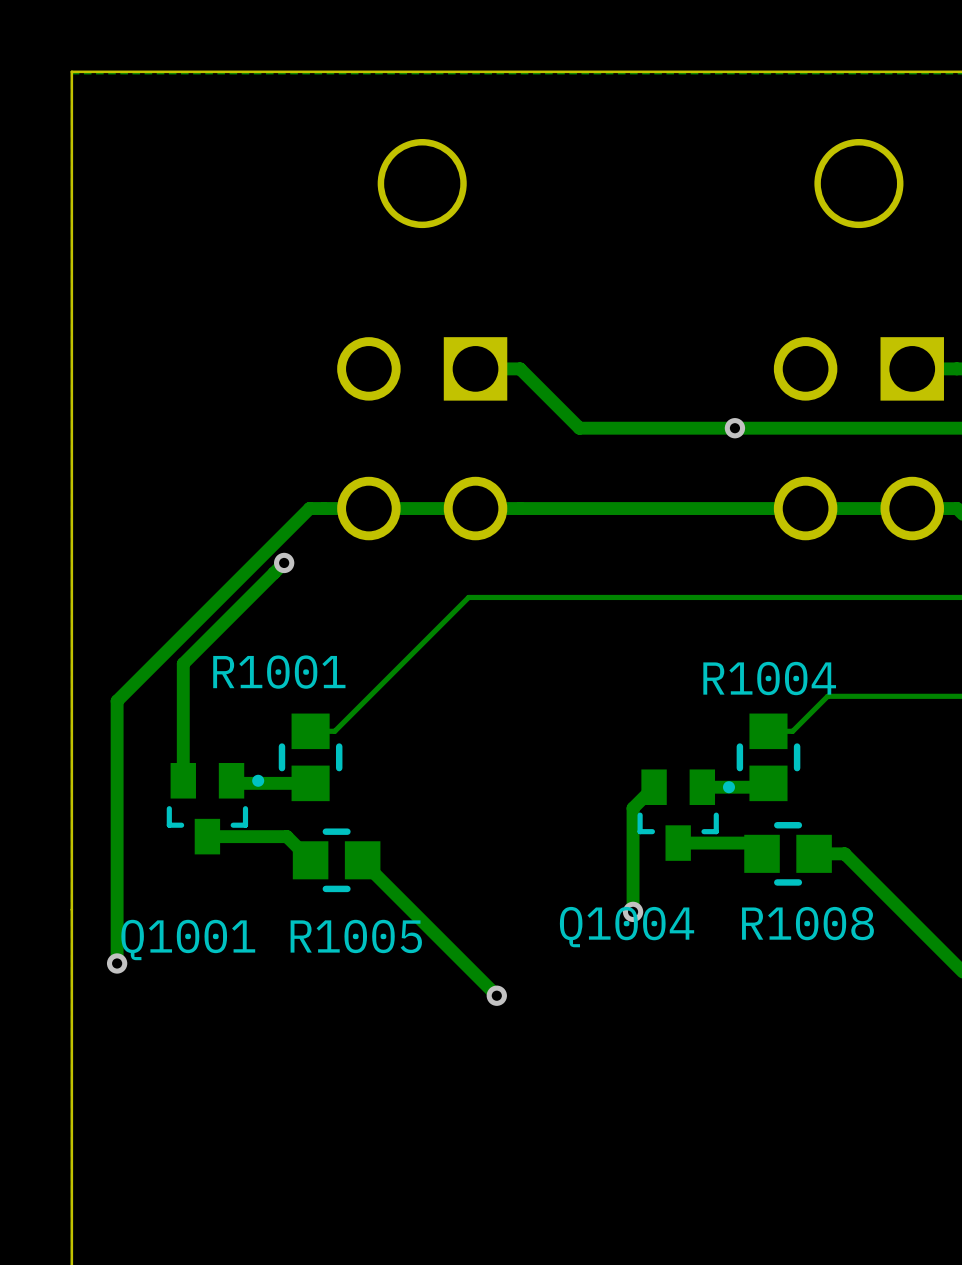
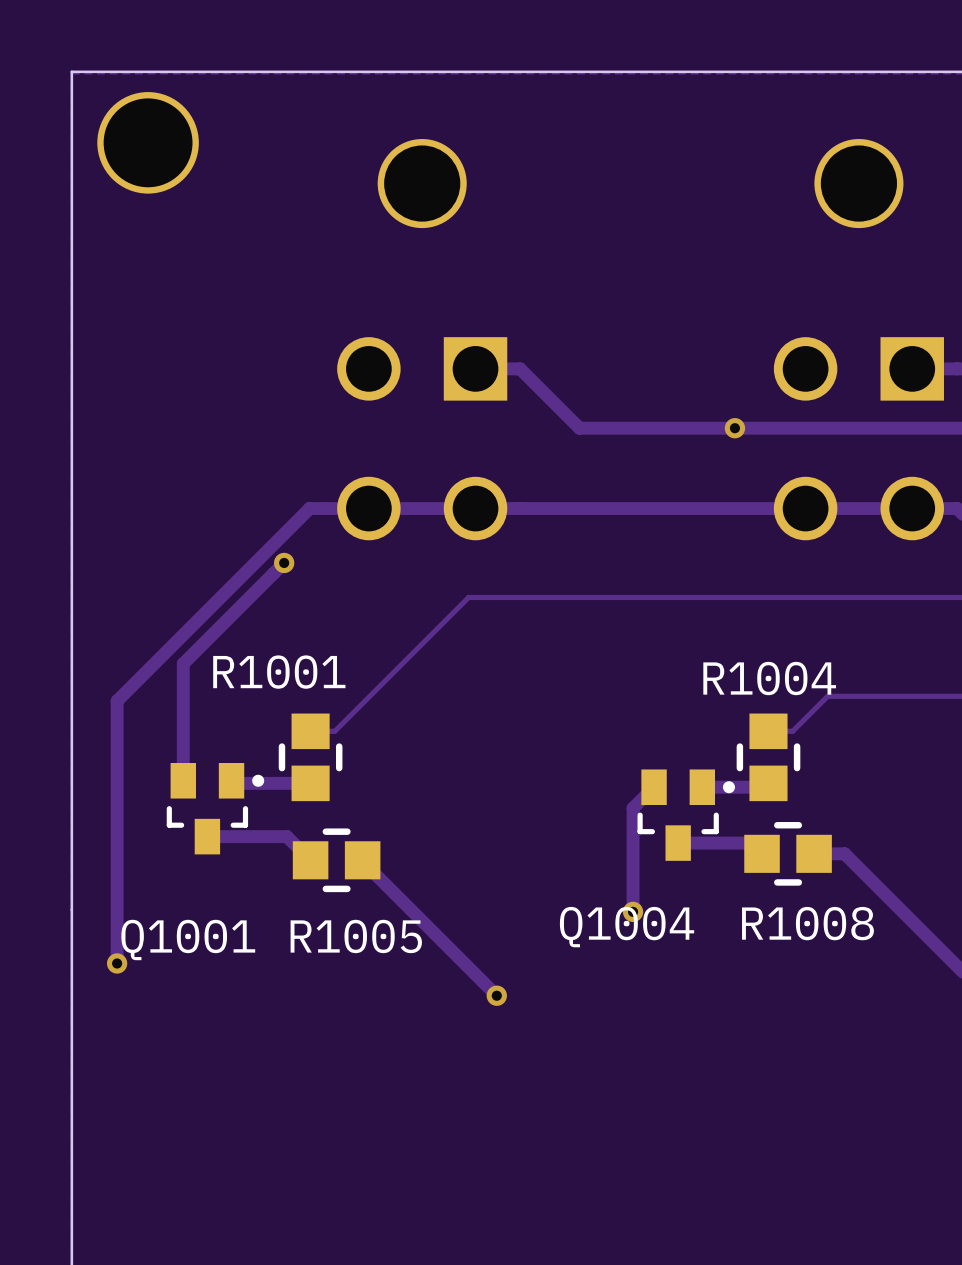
part: none -> (148, 142)

